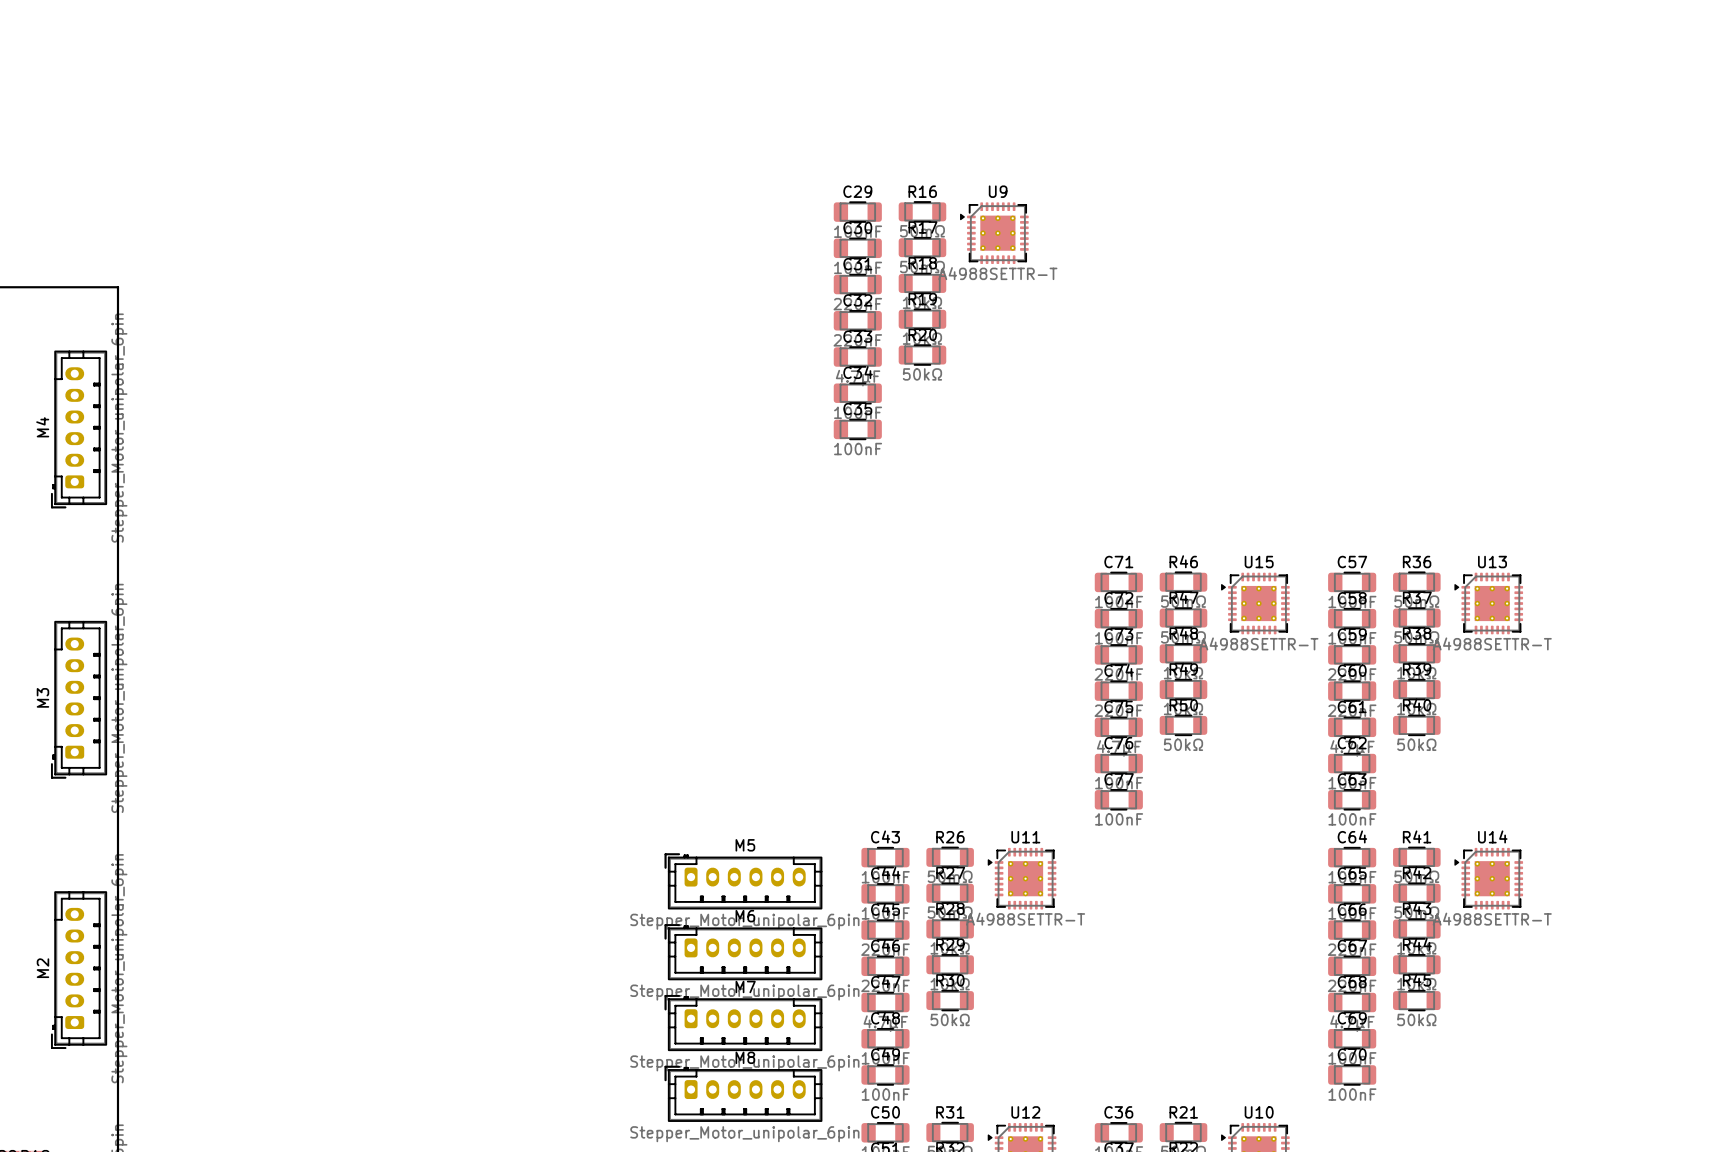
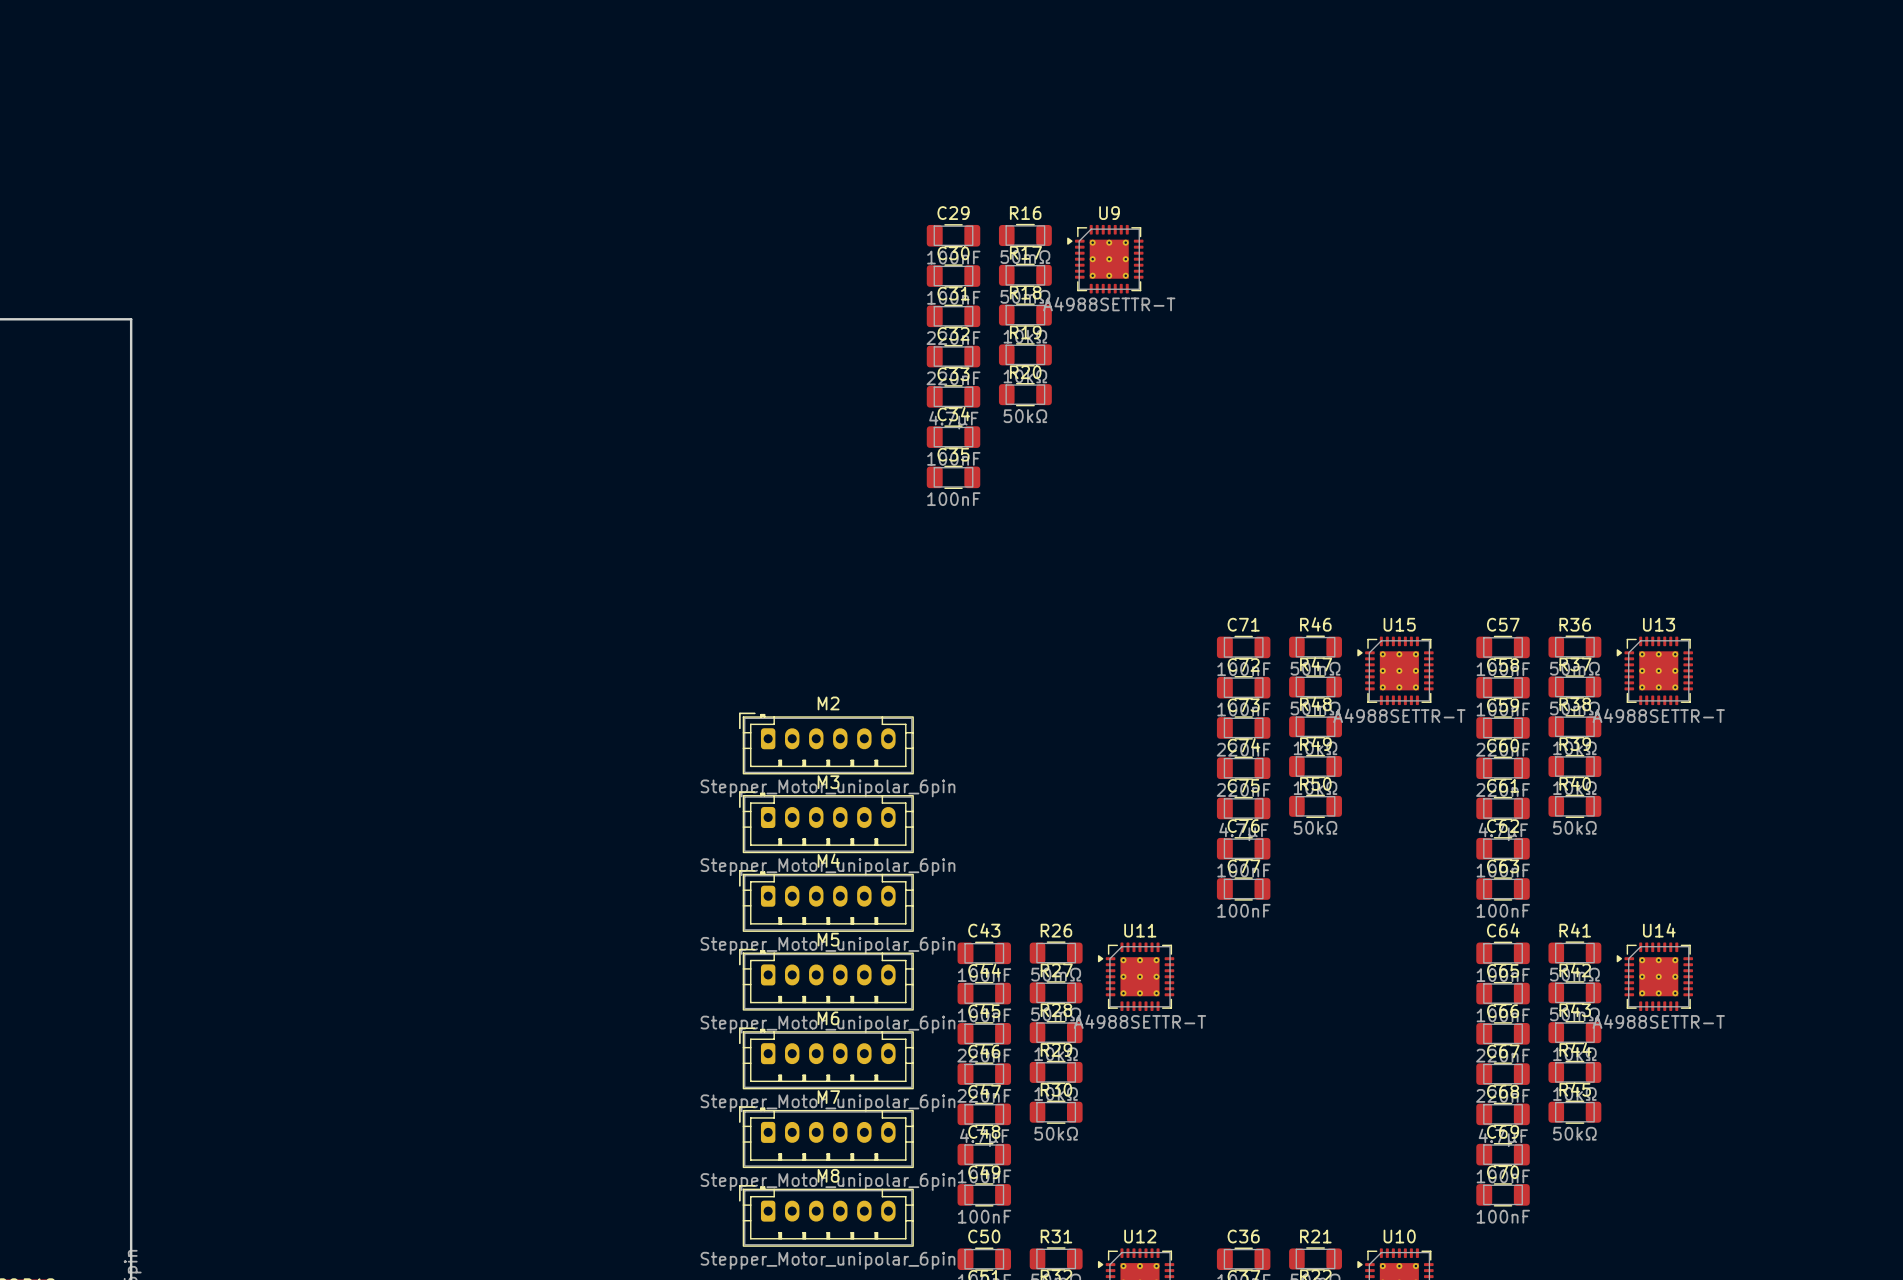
M4 rotation: 0° (79, 429) -> 90° clockwise (826, 901)
M4 position: (79, 429) -> (826, 901)
M3 rotation: 0° (79, 699) -> 90° clockwise (826, 822)
M3 position: (79, 699) -> (826, 822)
M2 rotation: 0° (79, 970) -> 90° clockwise (826, 743)
M2 position: (79, 970) -> (826, 743)

